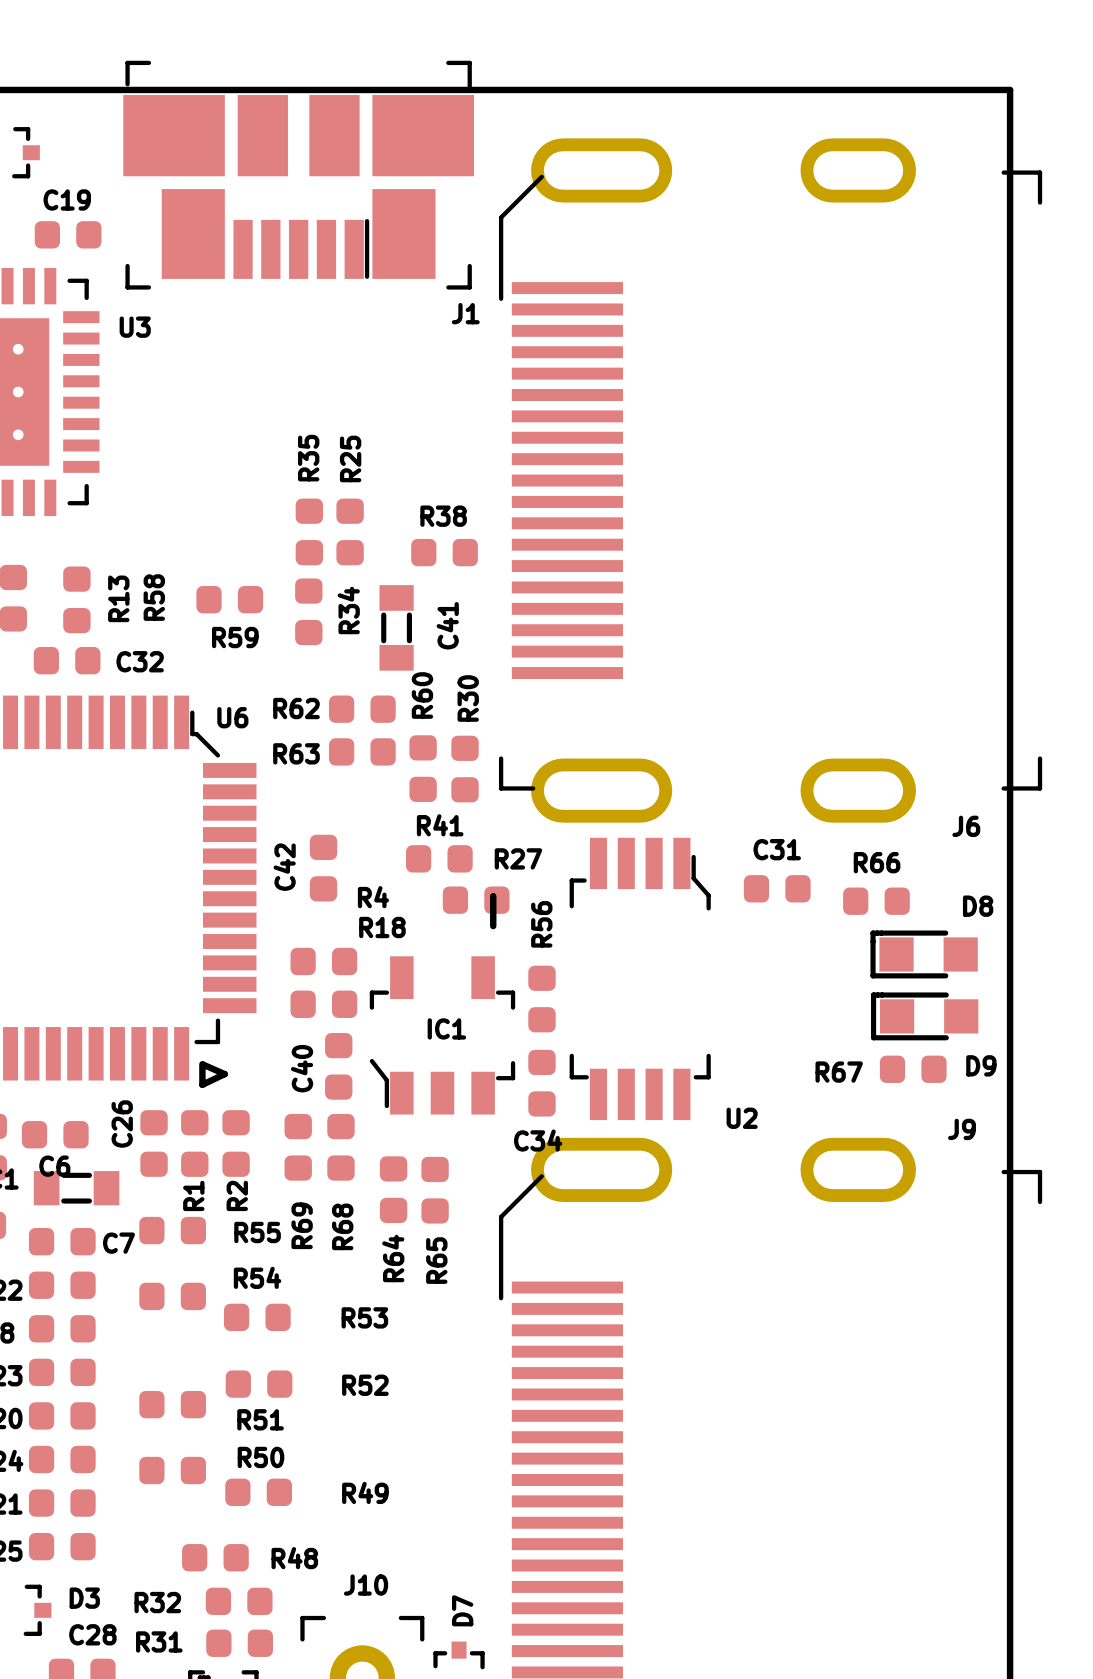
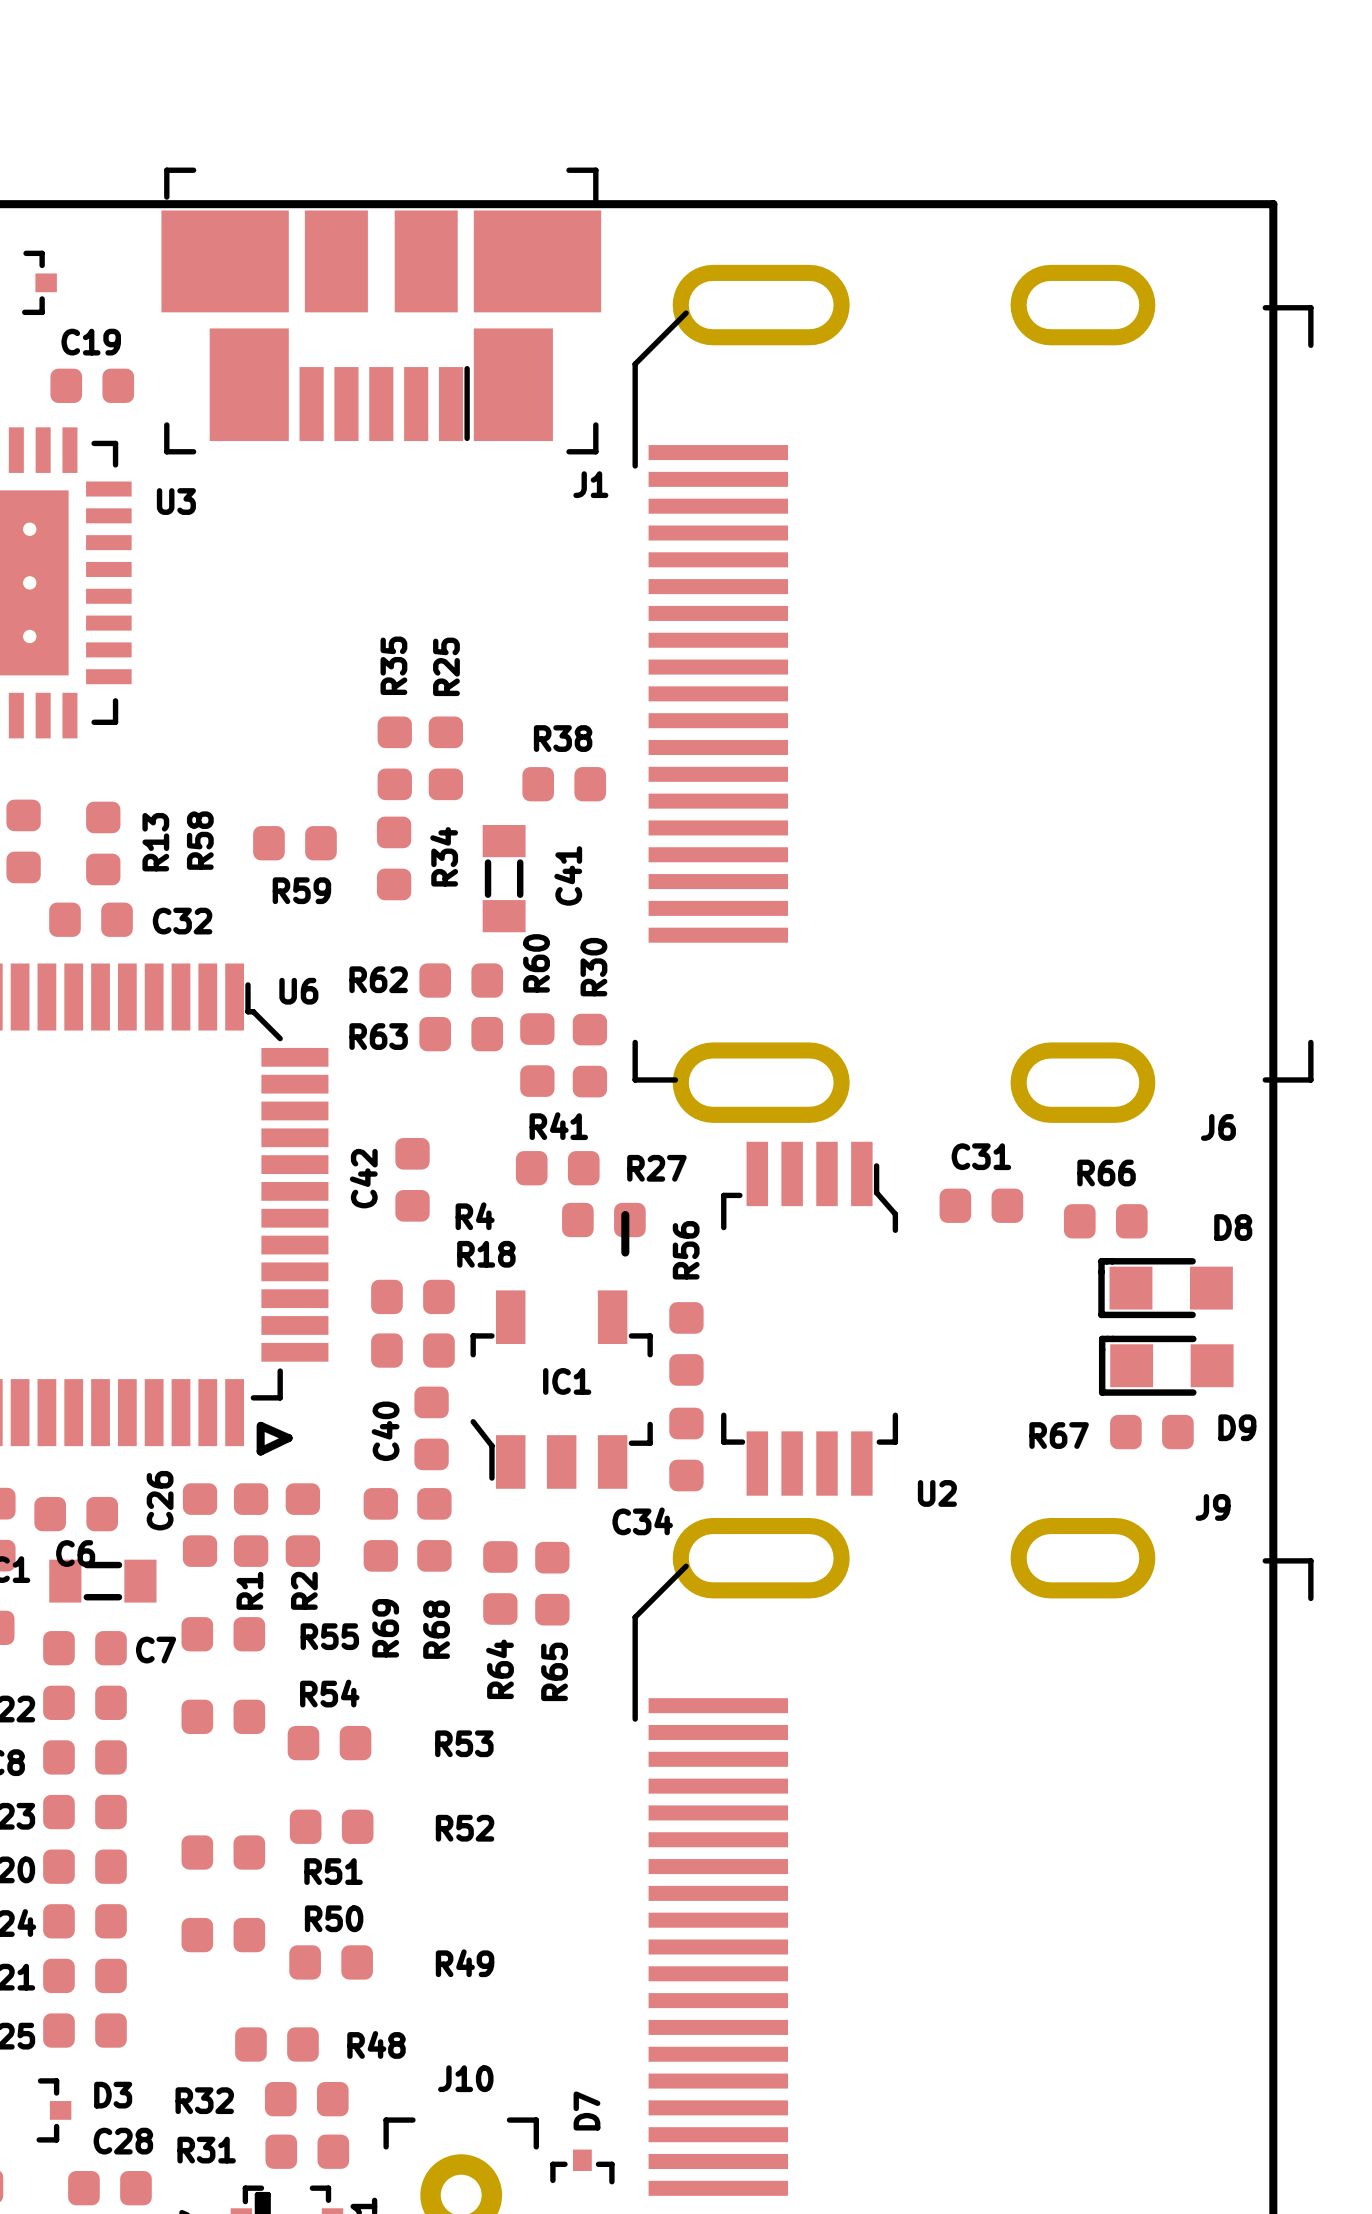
C34 name position: C34 (538, 1140) -> C34 (642, 1521)

